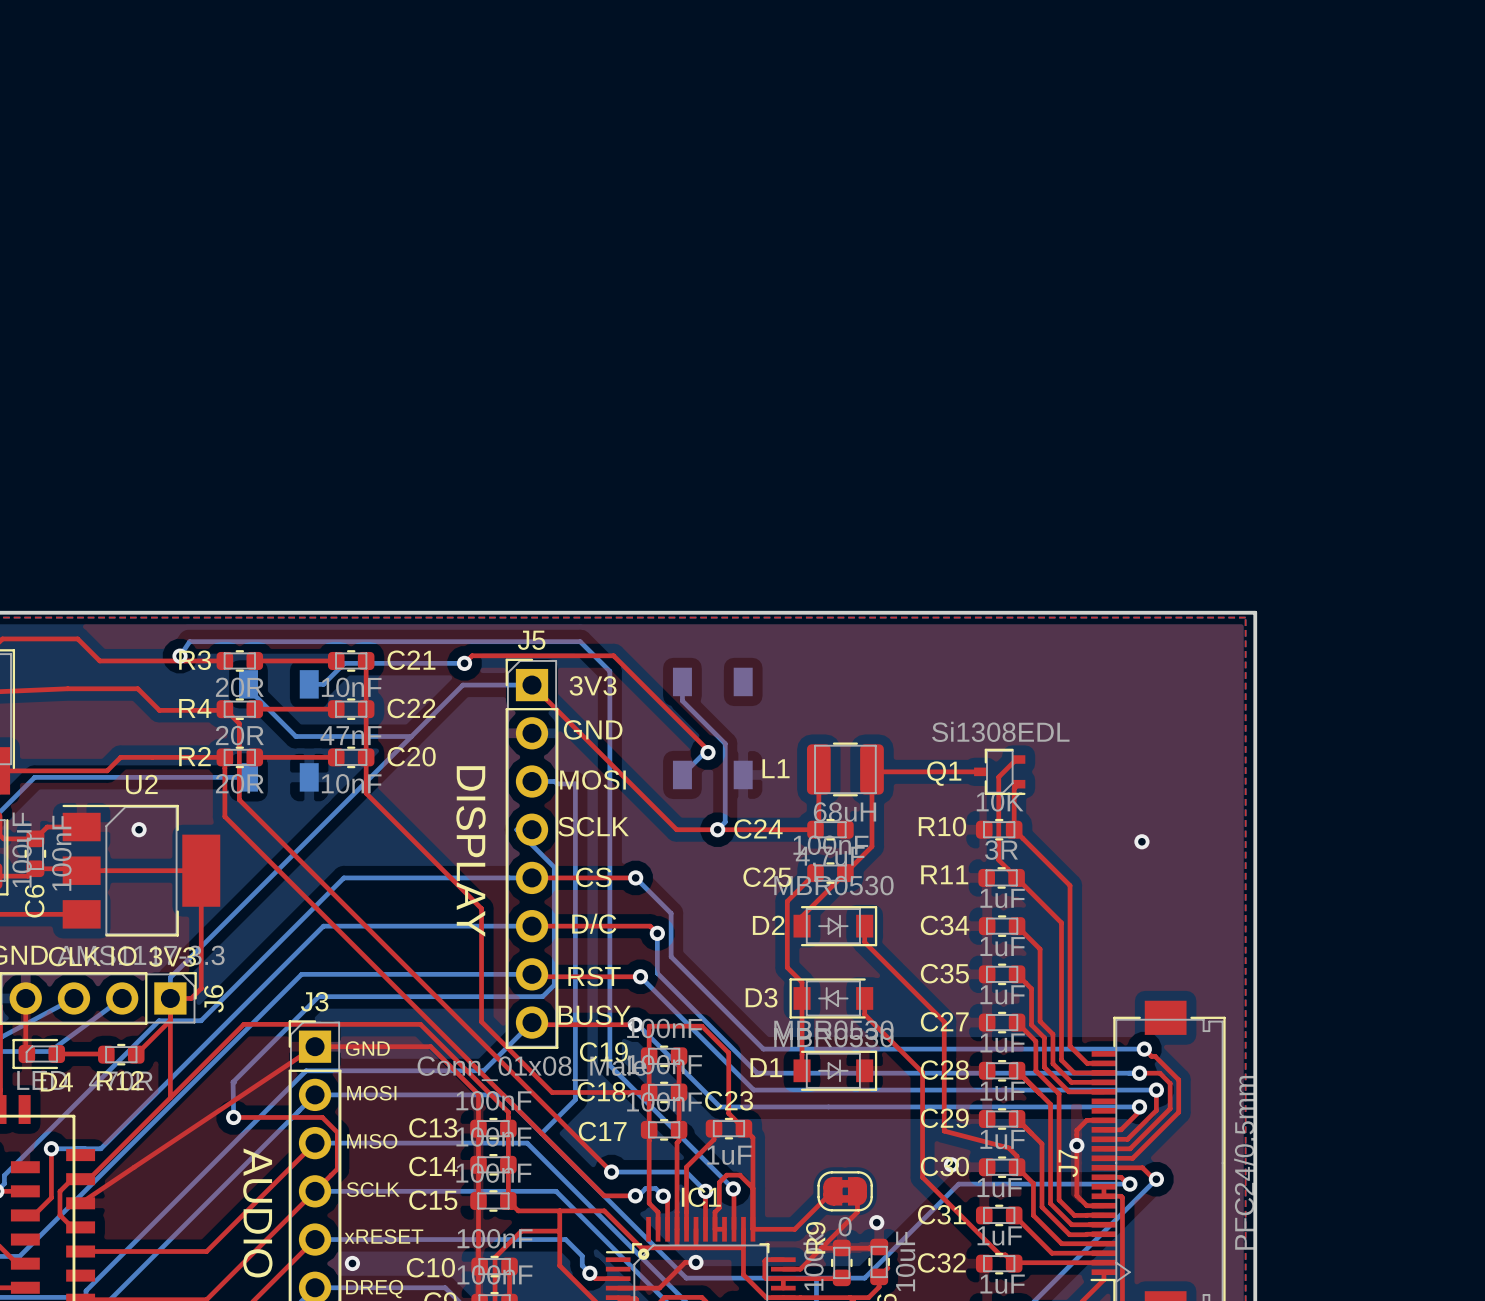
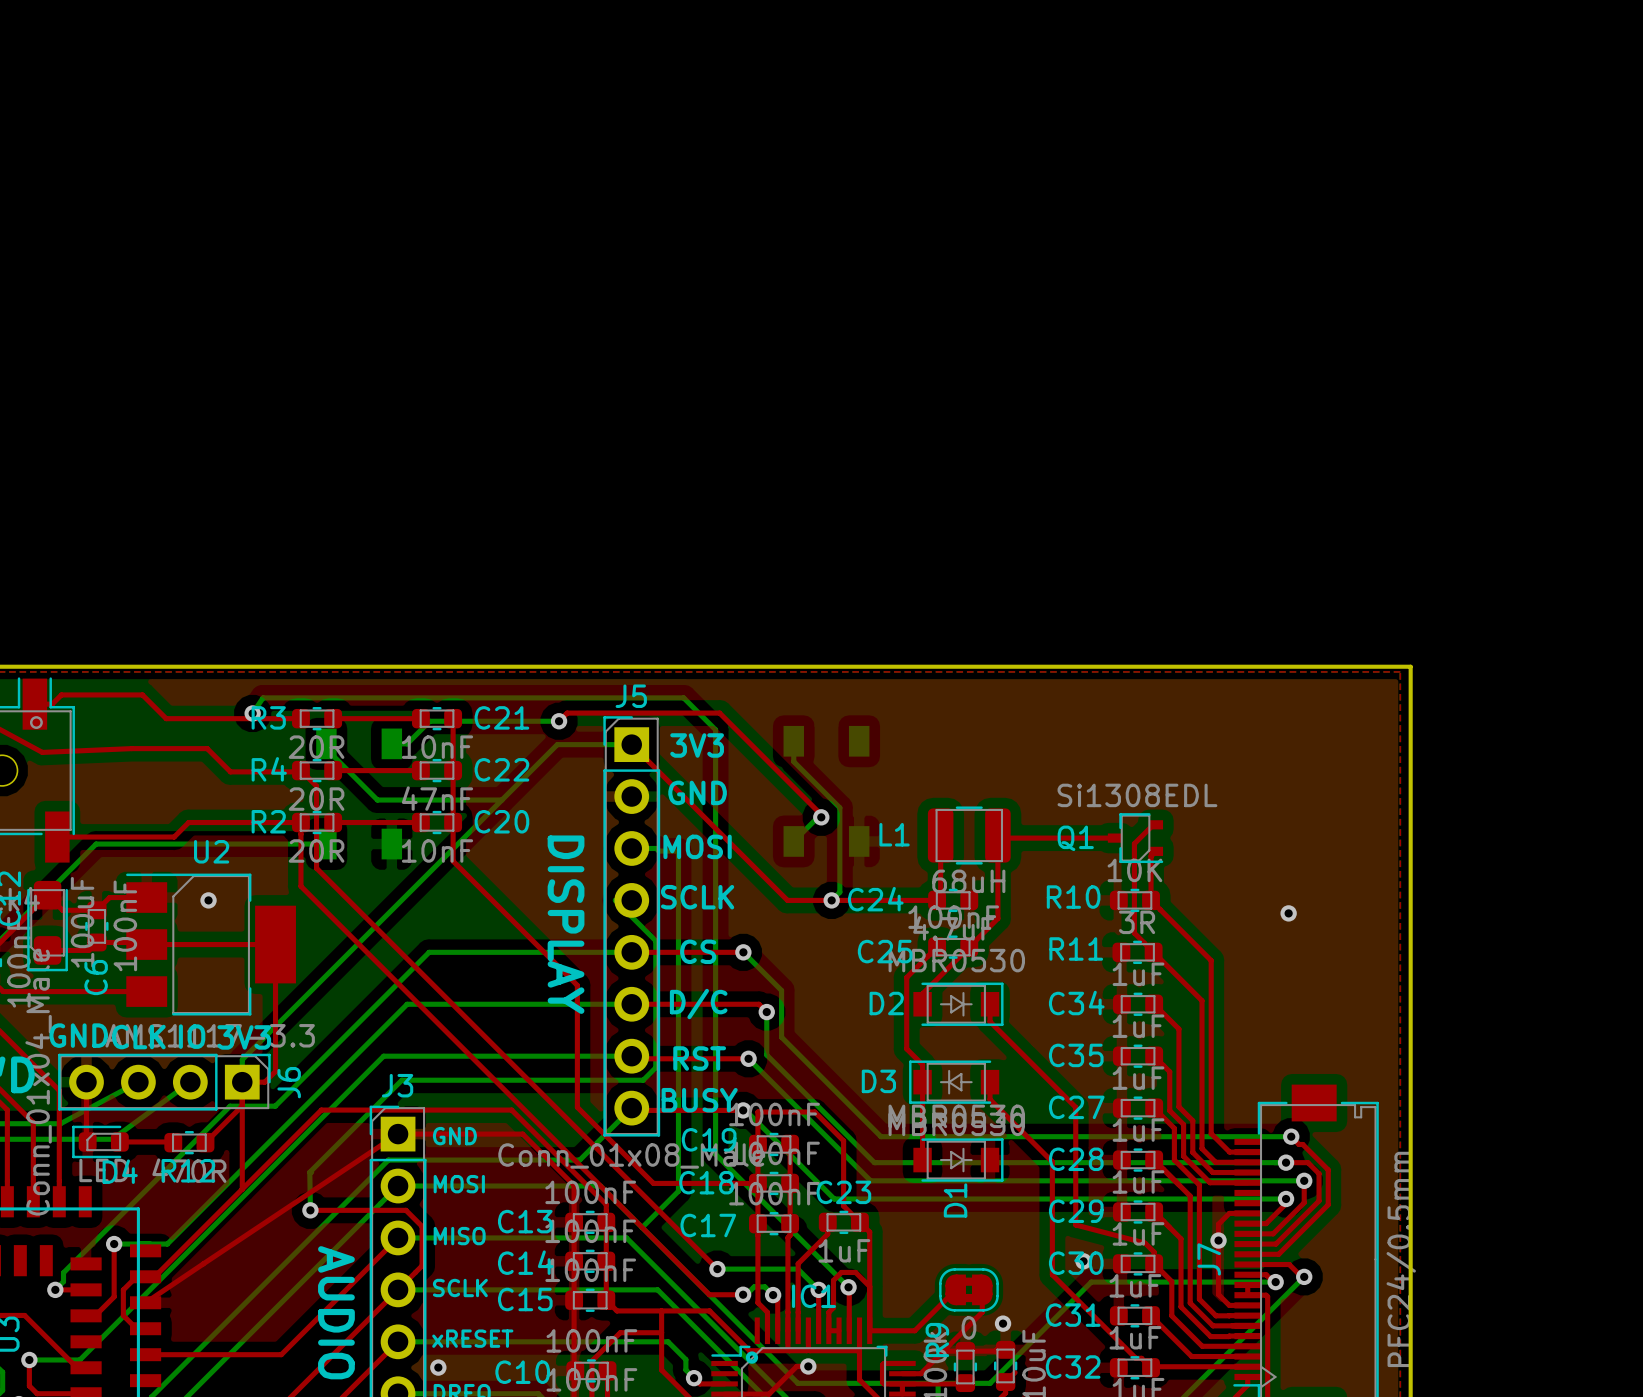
D1 name rotation: 0° (766, 1067) -> 90° counterclockwise (955, 1200)
D1 name position: D1 (766, 1067) -> D1 (955, 1200)

